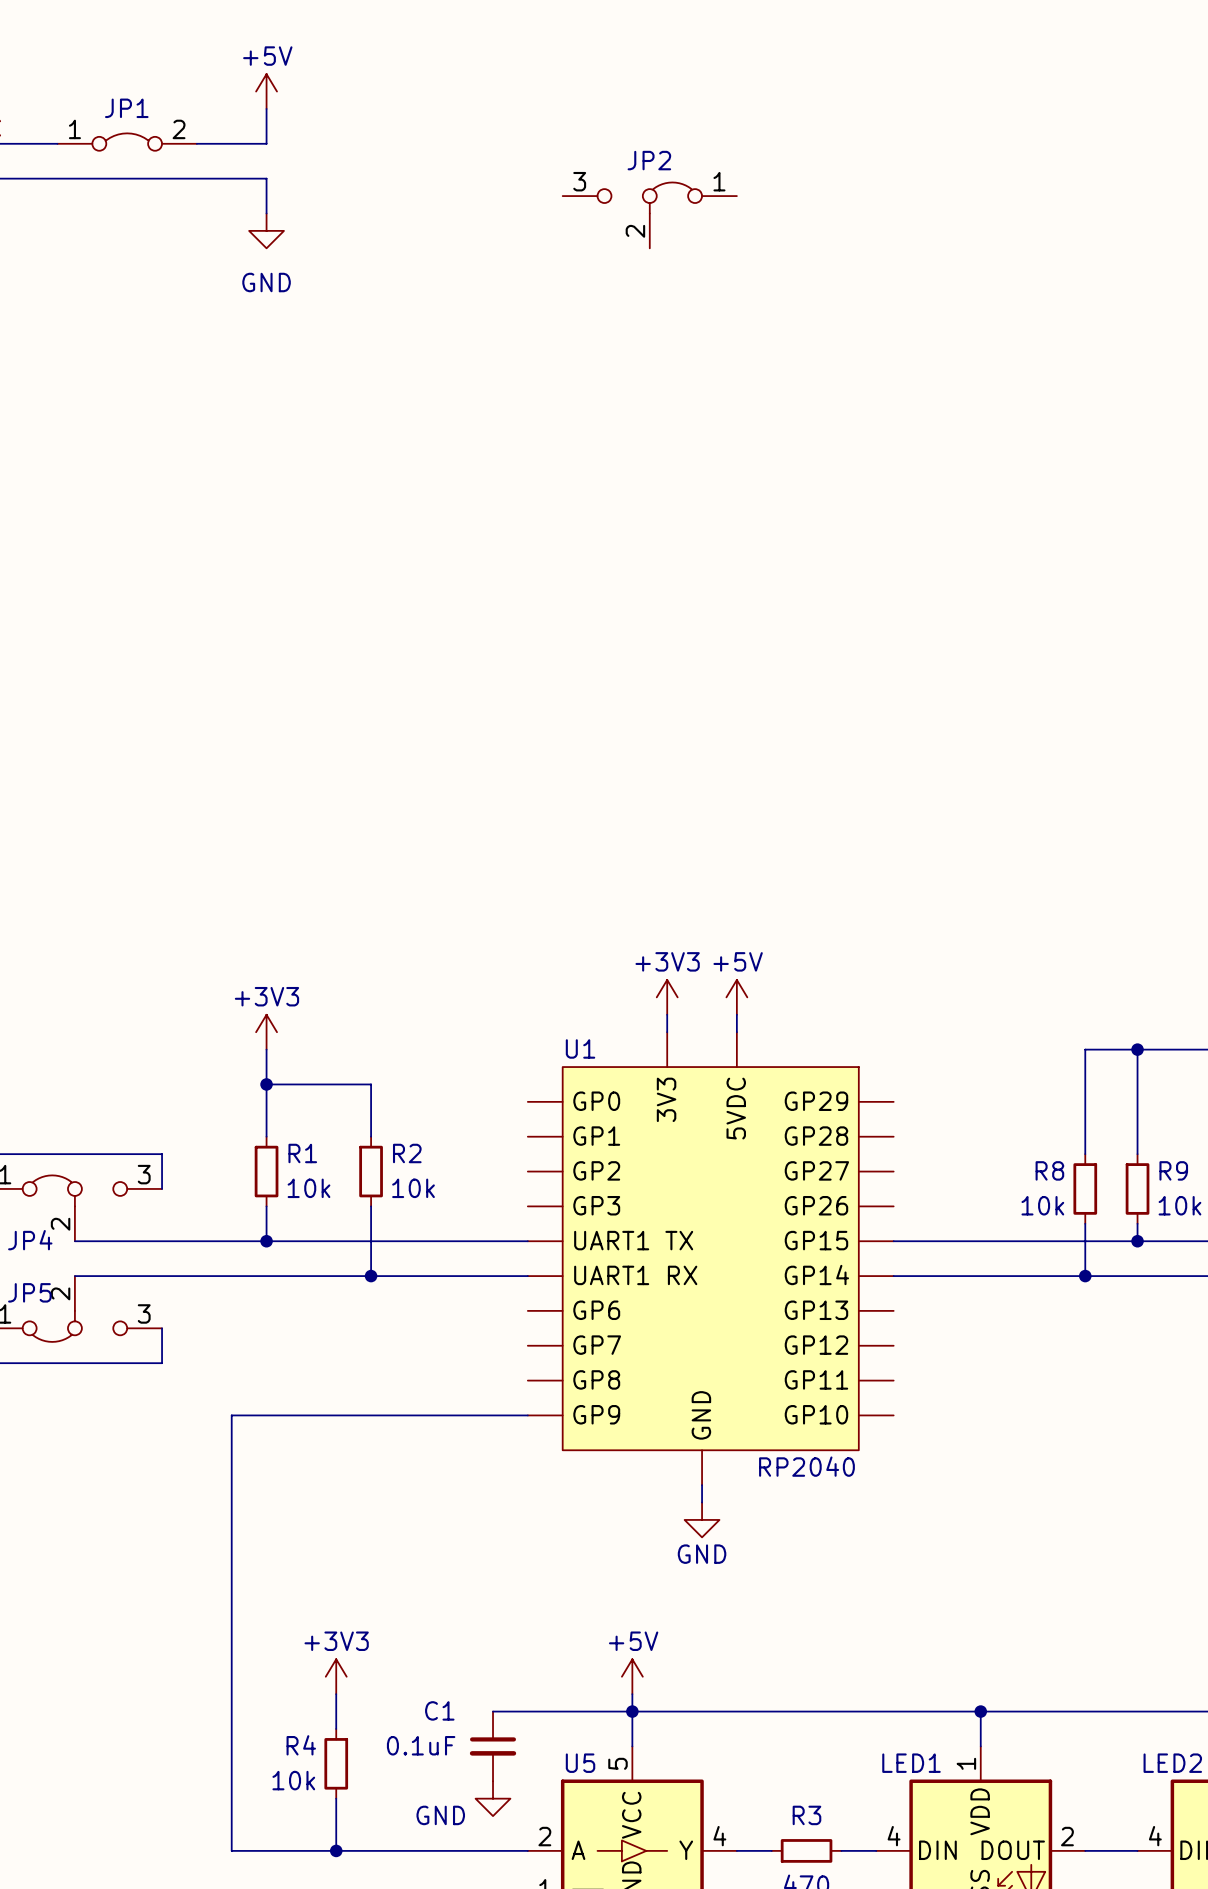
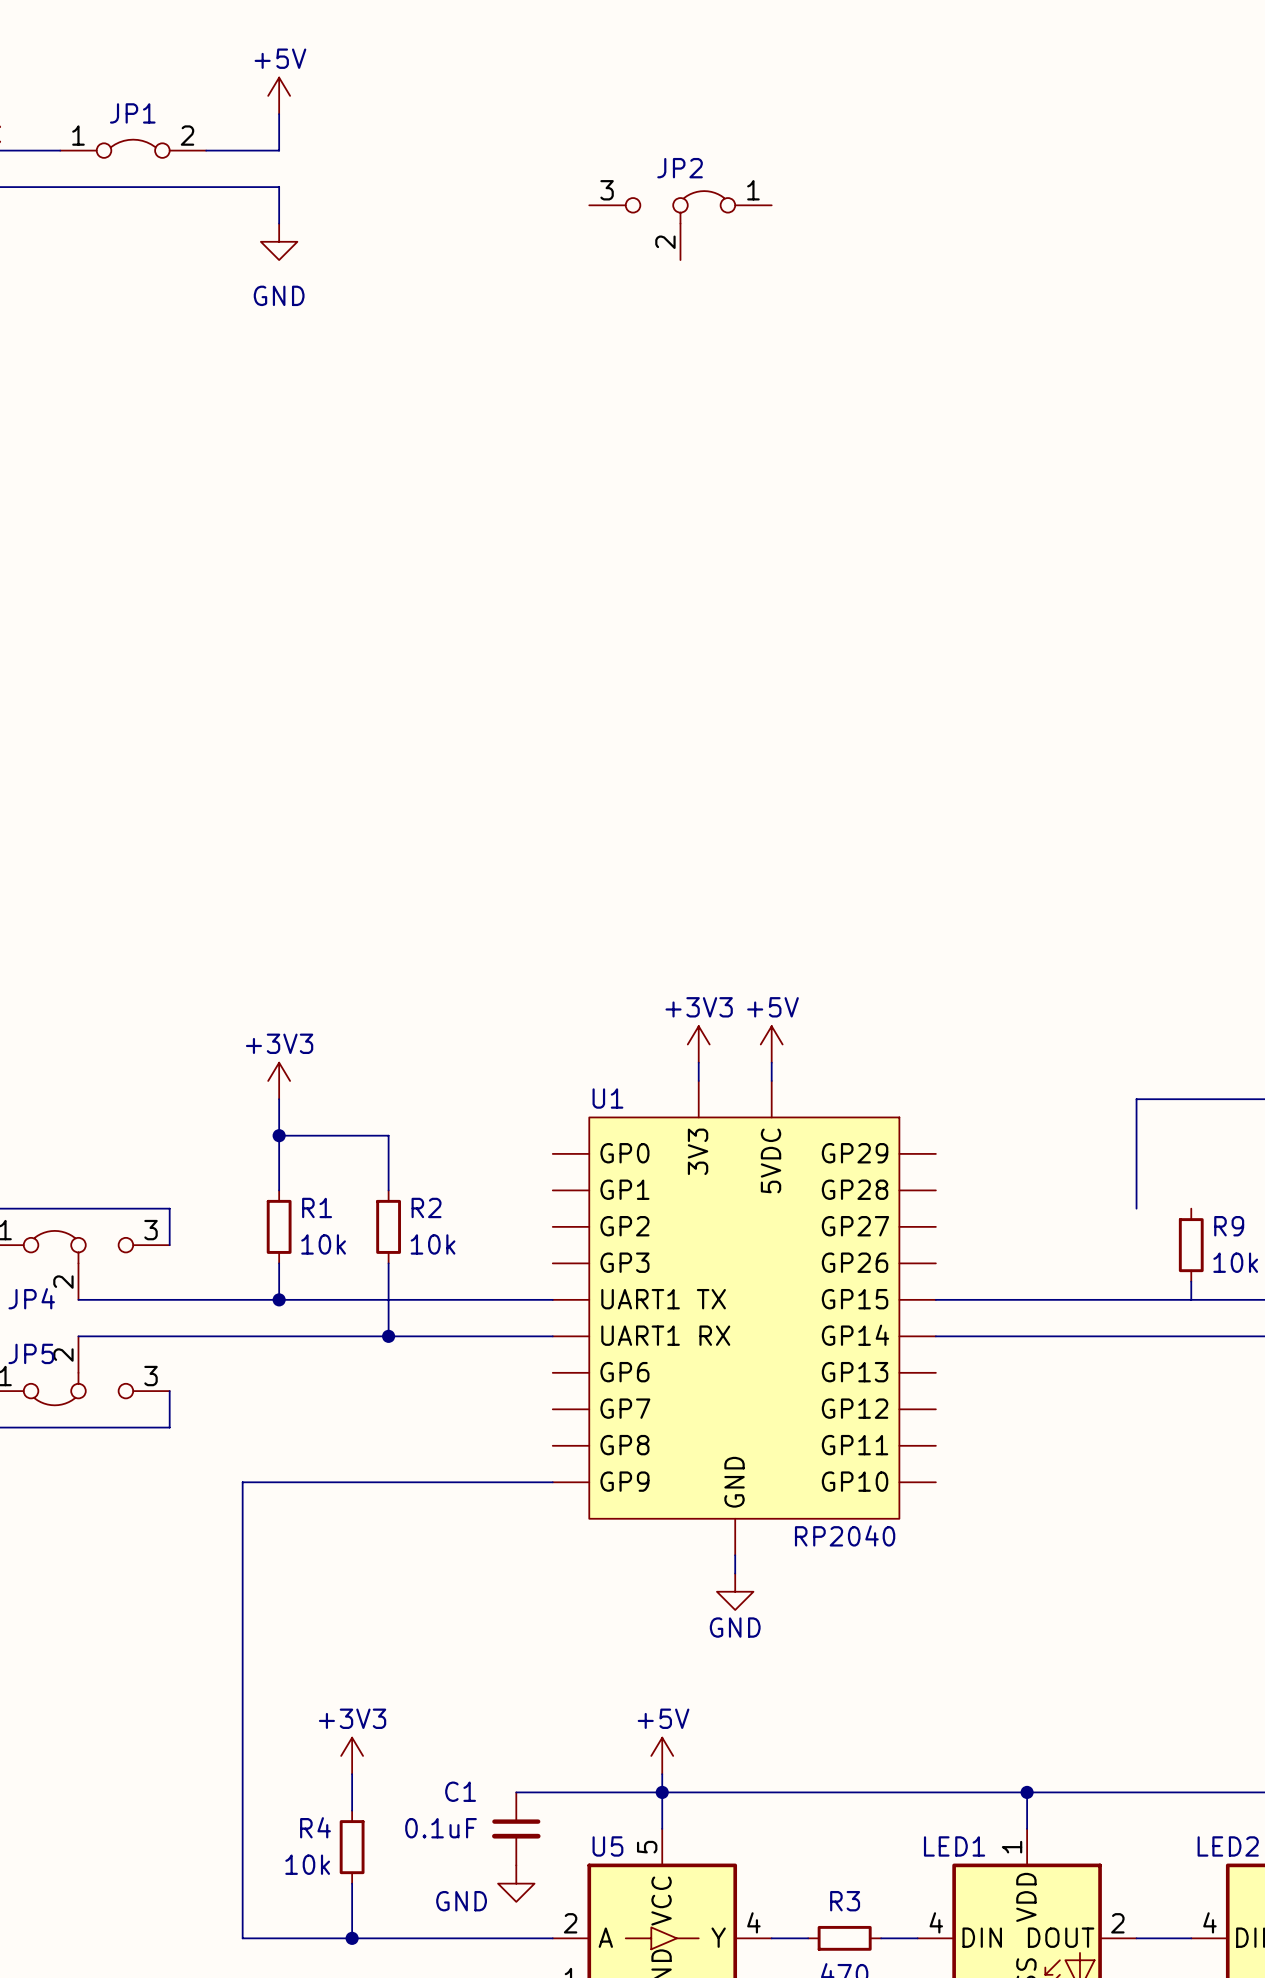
wire: (1137, 1049) (1137, 1154) -> none
junction: (1137, 1049) -> none
R8: 10k (1085, 1188) -> none
wire: (1085, 1223) (1085, 1276) -> none
junction: (1137, 1241) -> none
junction: (1085, 1276) -> none

